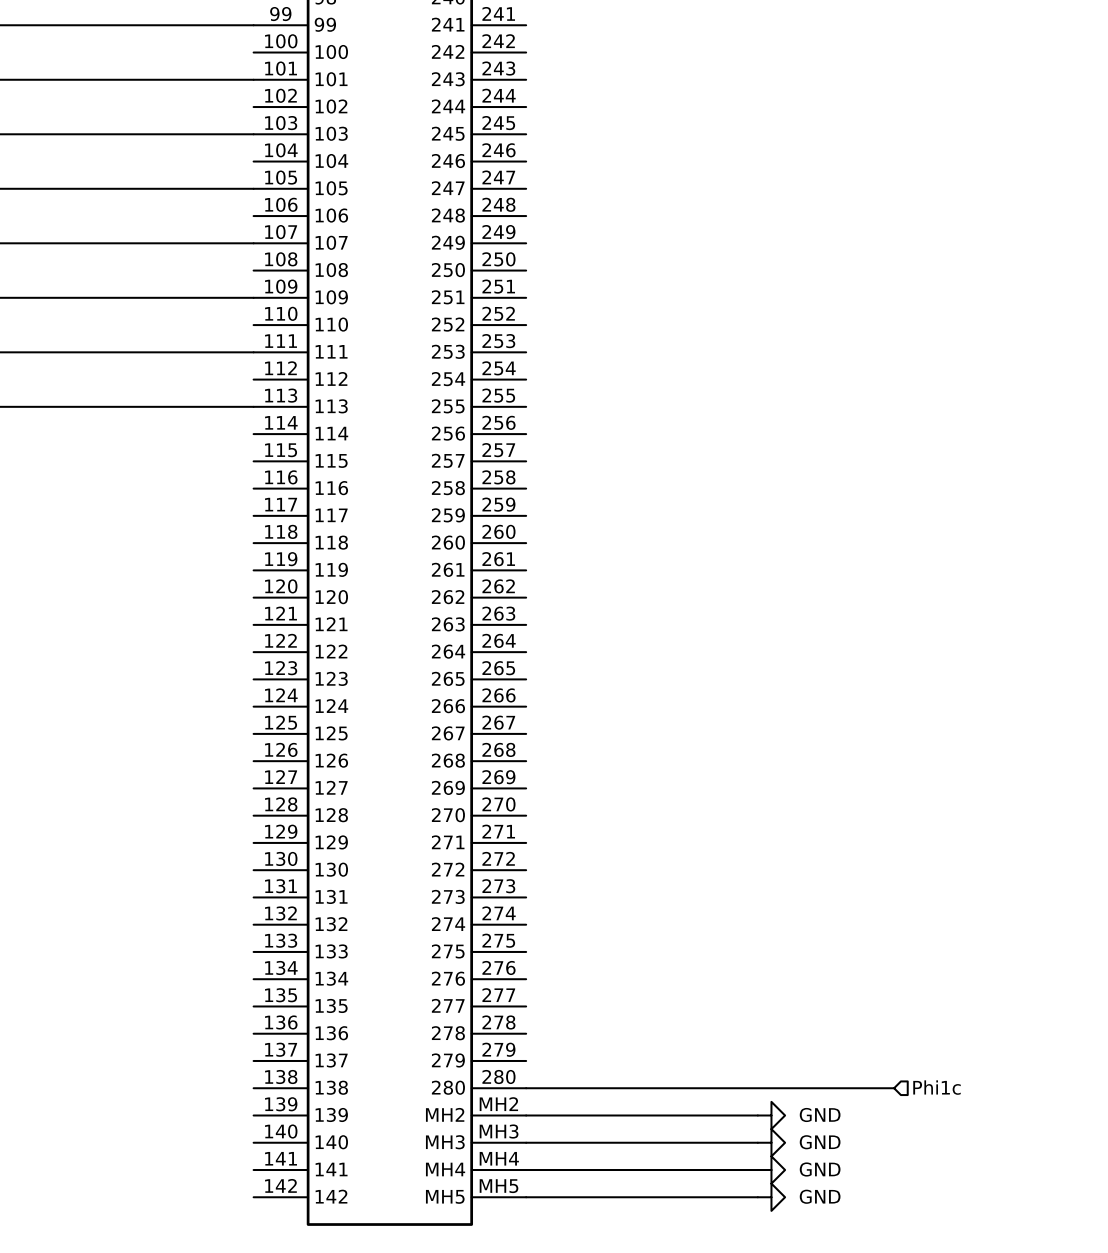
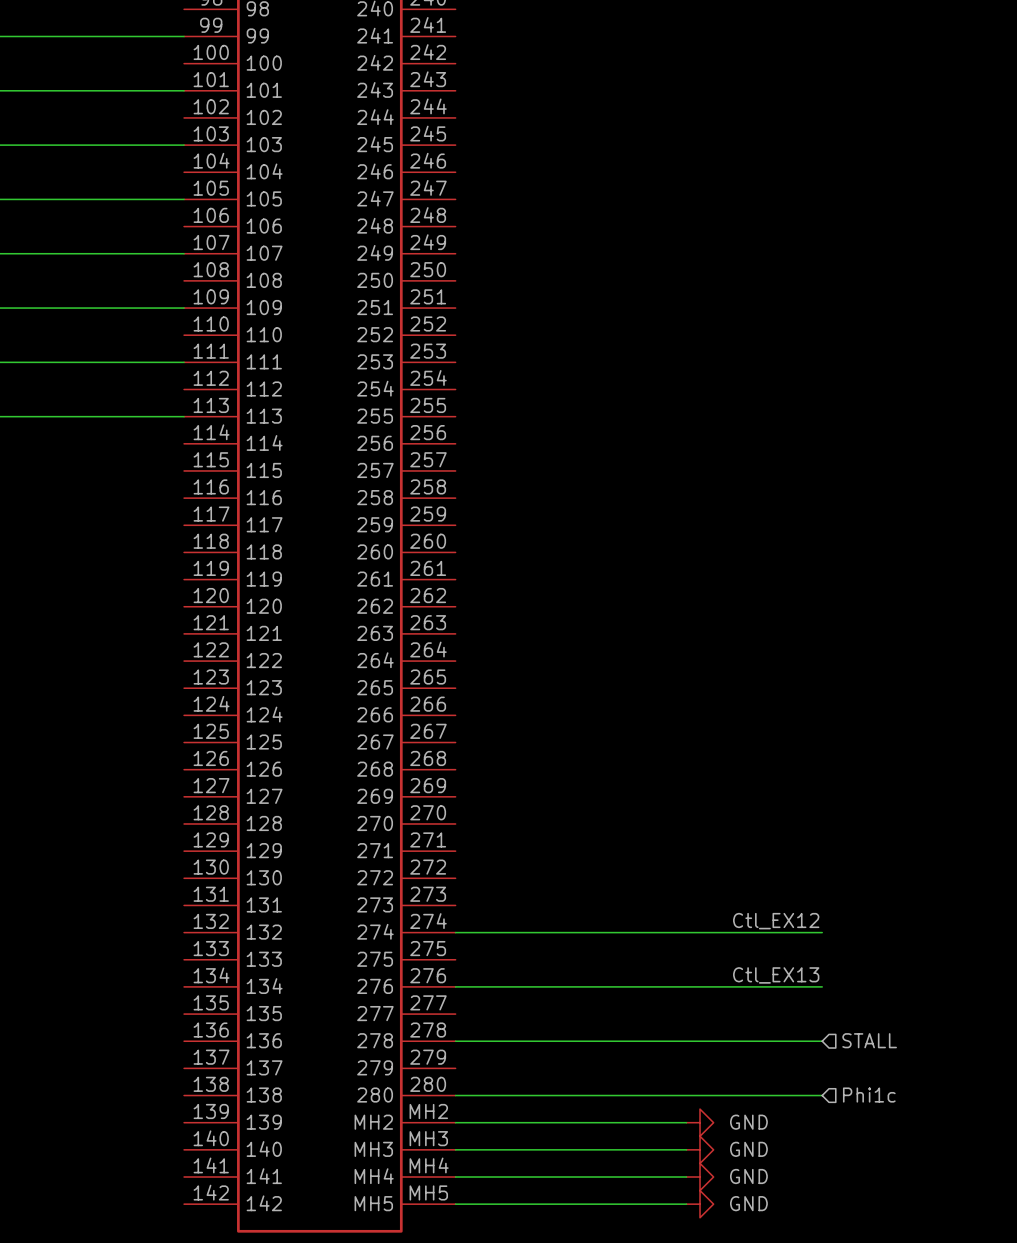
label: none -> Ctl_EX12 (776, 921)
wire: none -> (455, 932) (822, 932)
label: none -> Ctl_EX13 (776, 975)
wire: none -> (455, 986) (822, 986)
wire: none -> (455, 1041) (822, 1041)
hierarchical label: none -> STALL (869, 1040)

